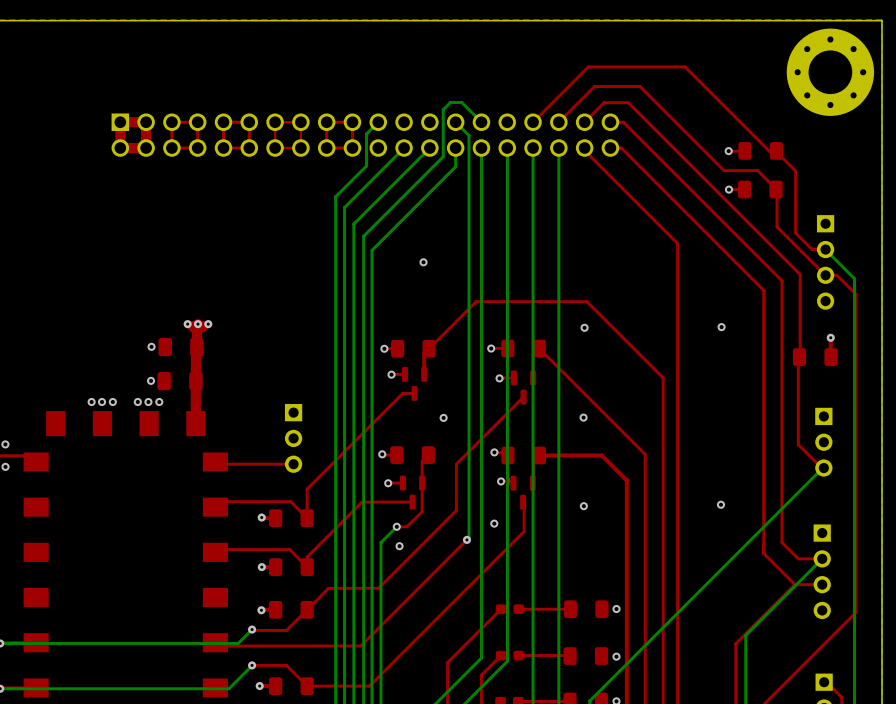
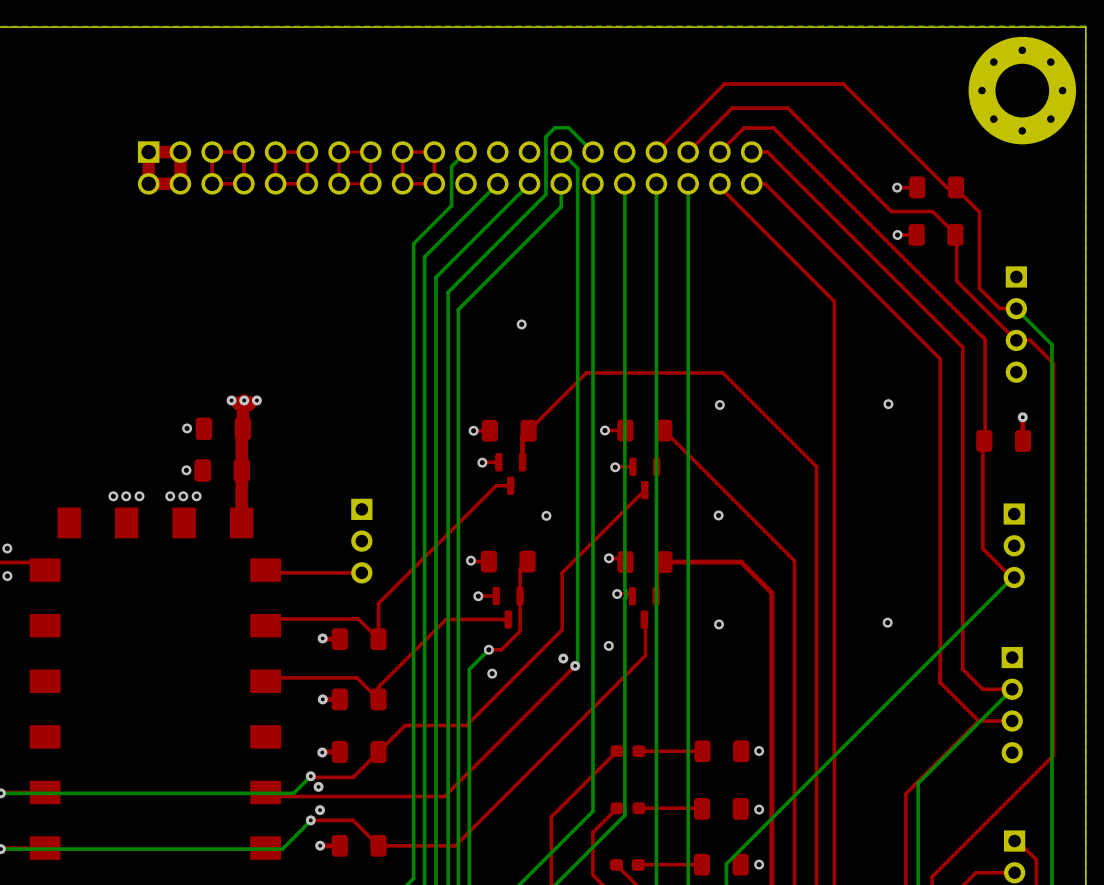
via: none -> (563, 658)
via: none -> (318, 786)
via: none -> (320, 810)

